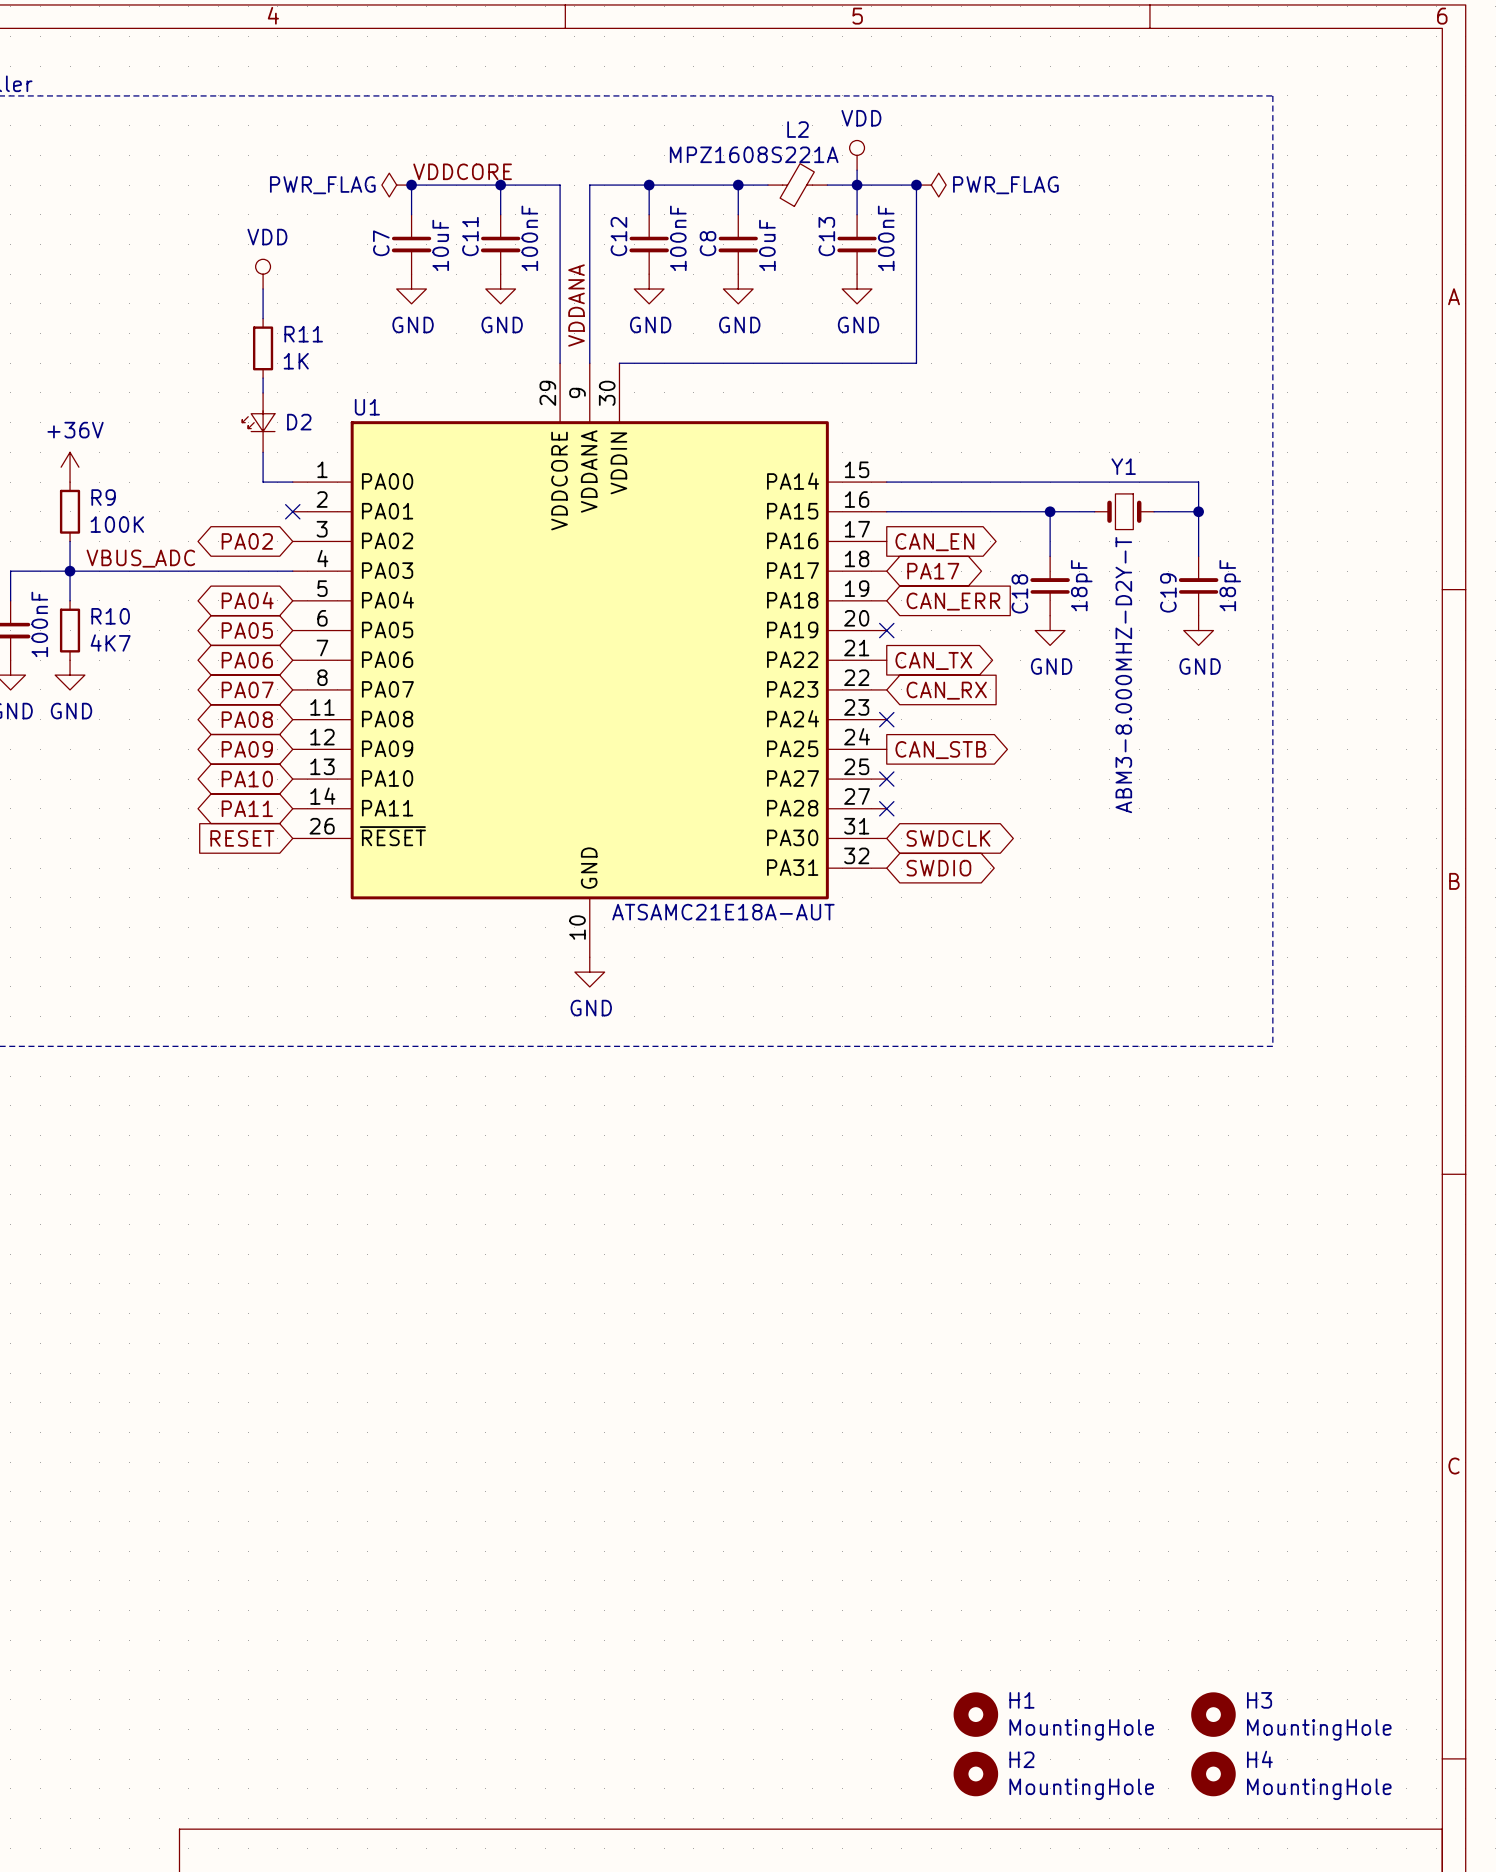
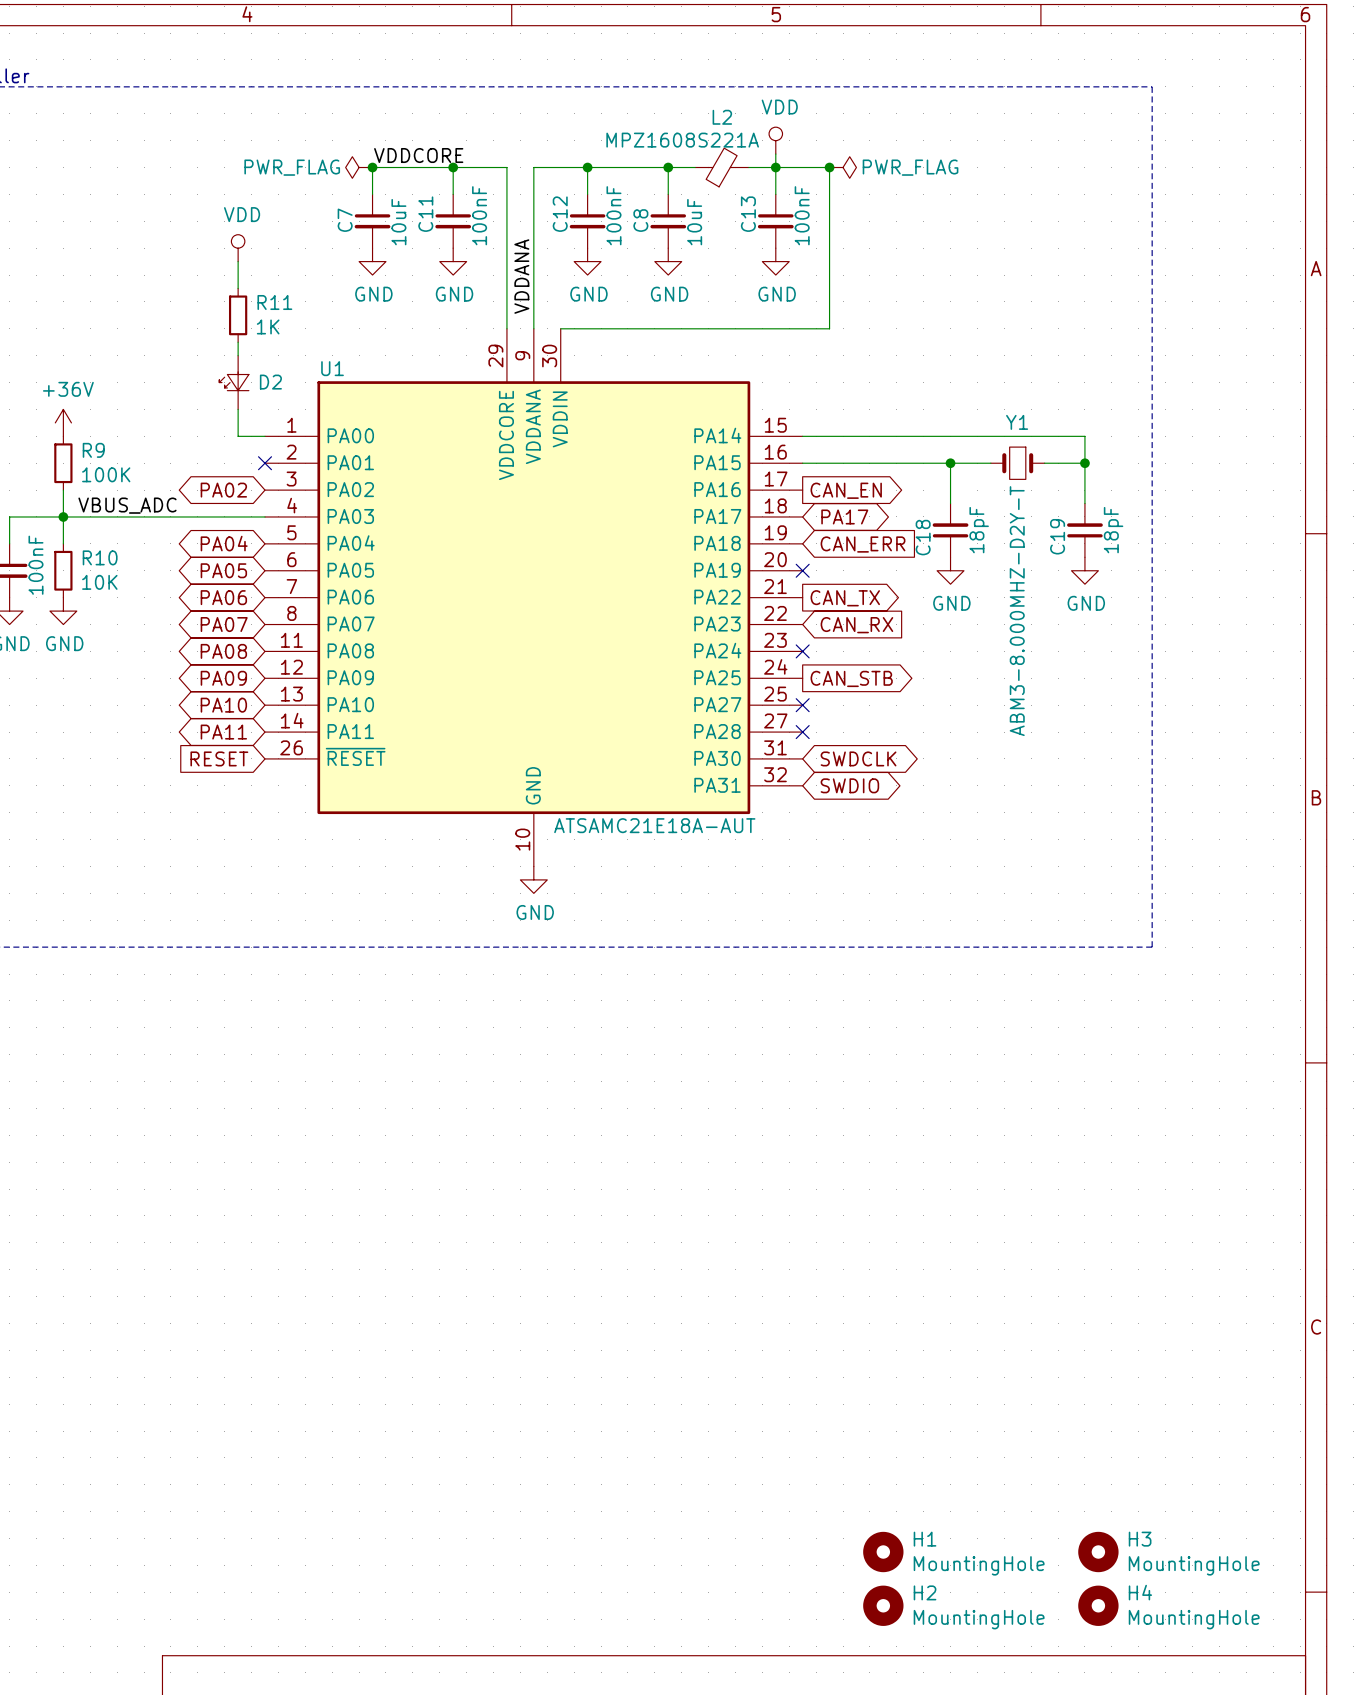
R10 value: 4K7 (110, 643) -> 10K (99, 582)

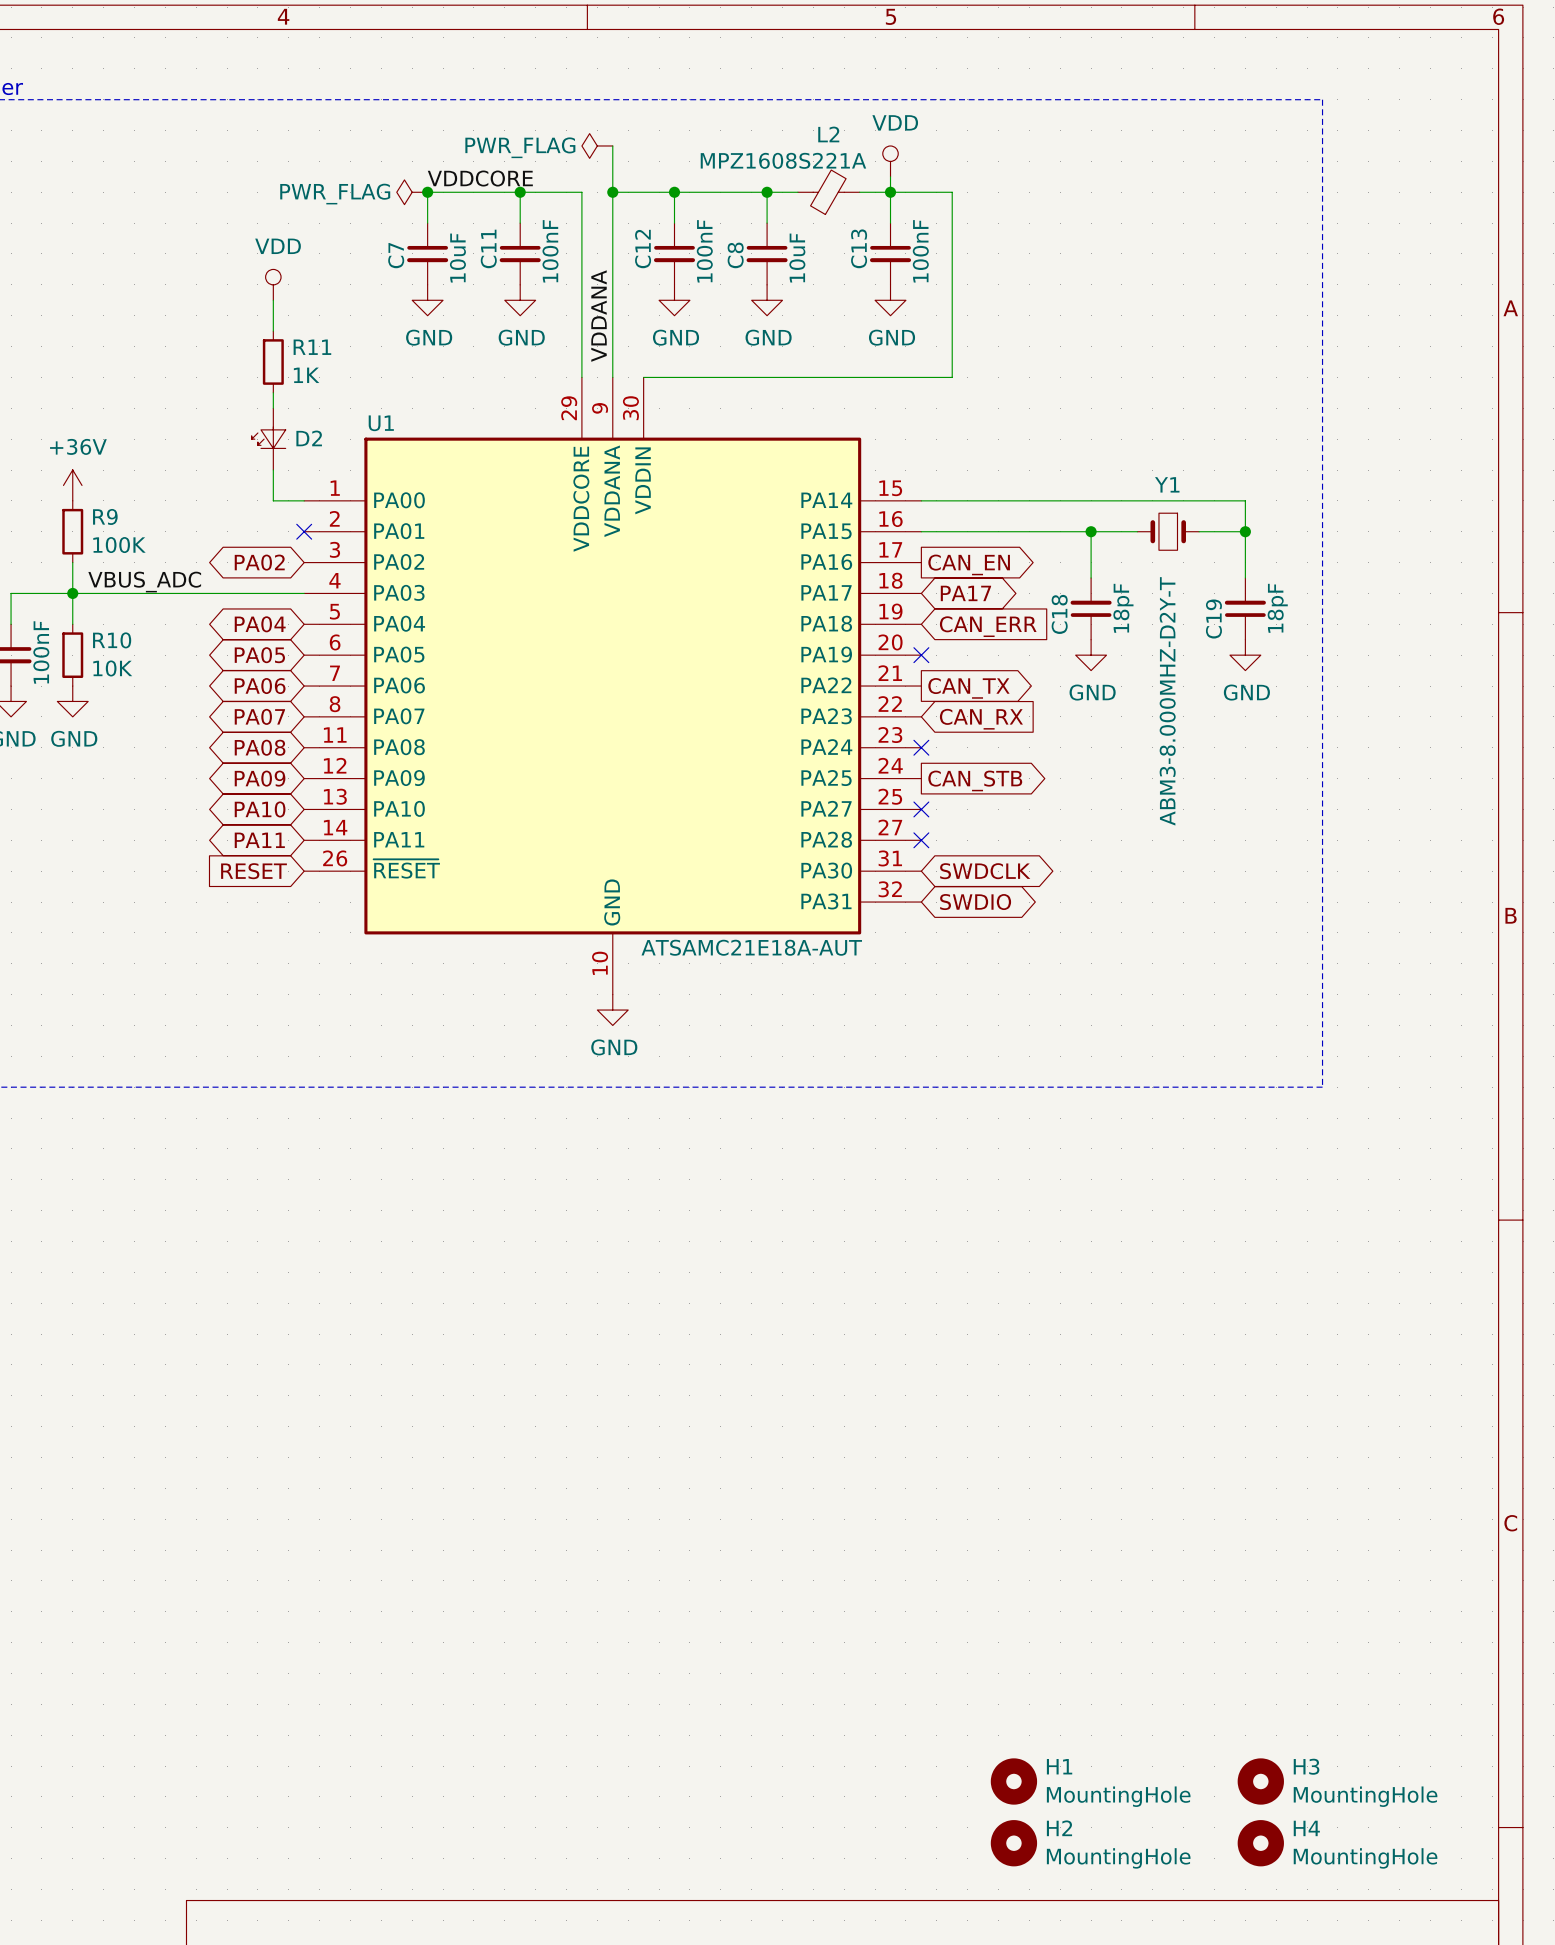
power symbol: none -> PWR_FLAG (597, 145)
wire: none -> (612, 145) (612, 192)
junction: none -> (612, 192)
junction: (829, 167) -> none
power symbol: PWR_FLAG (843, 167) -> none

